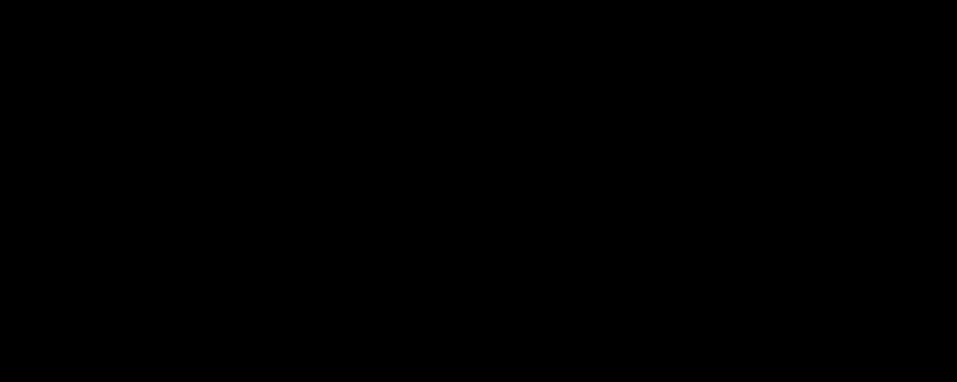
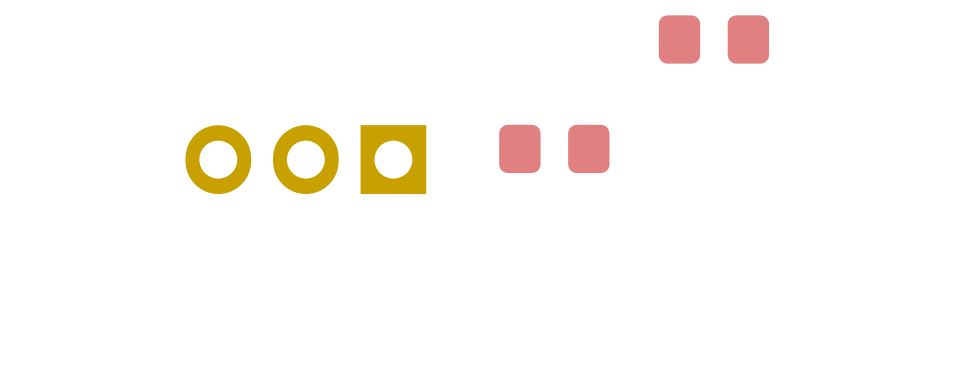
part: none -> (713, 39)
part: none -> (554, 148)
part: none -> (305, 159)

